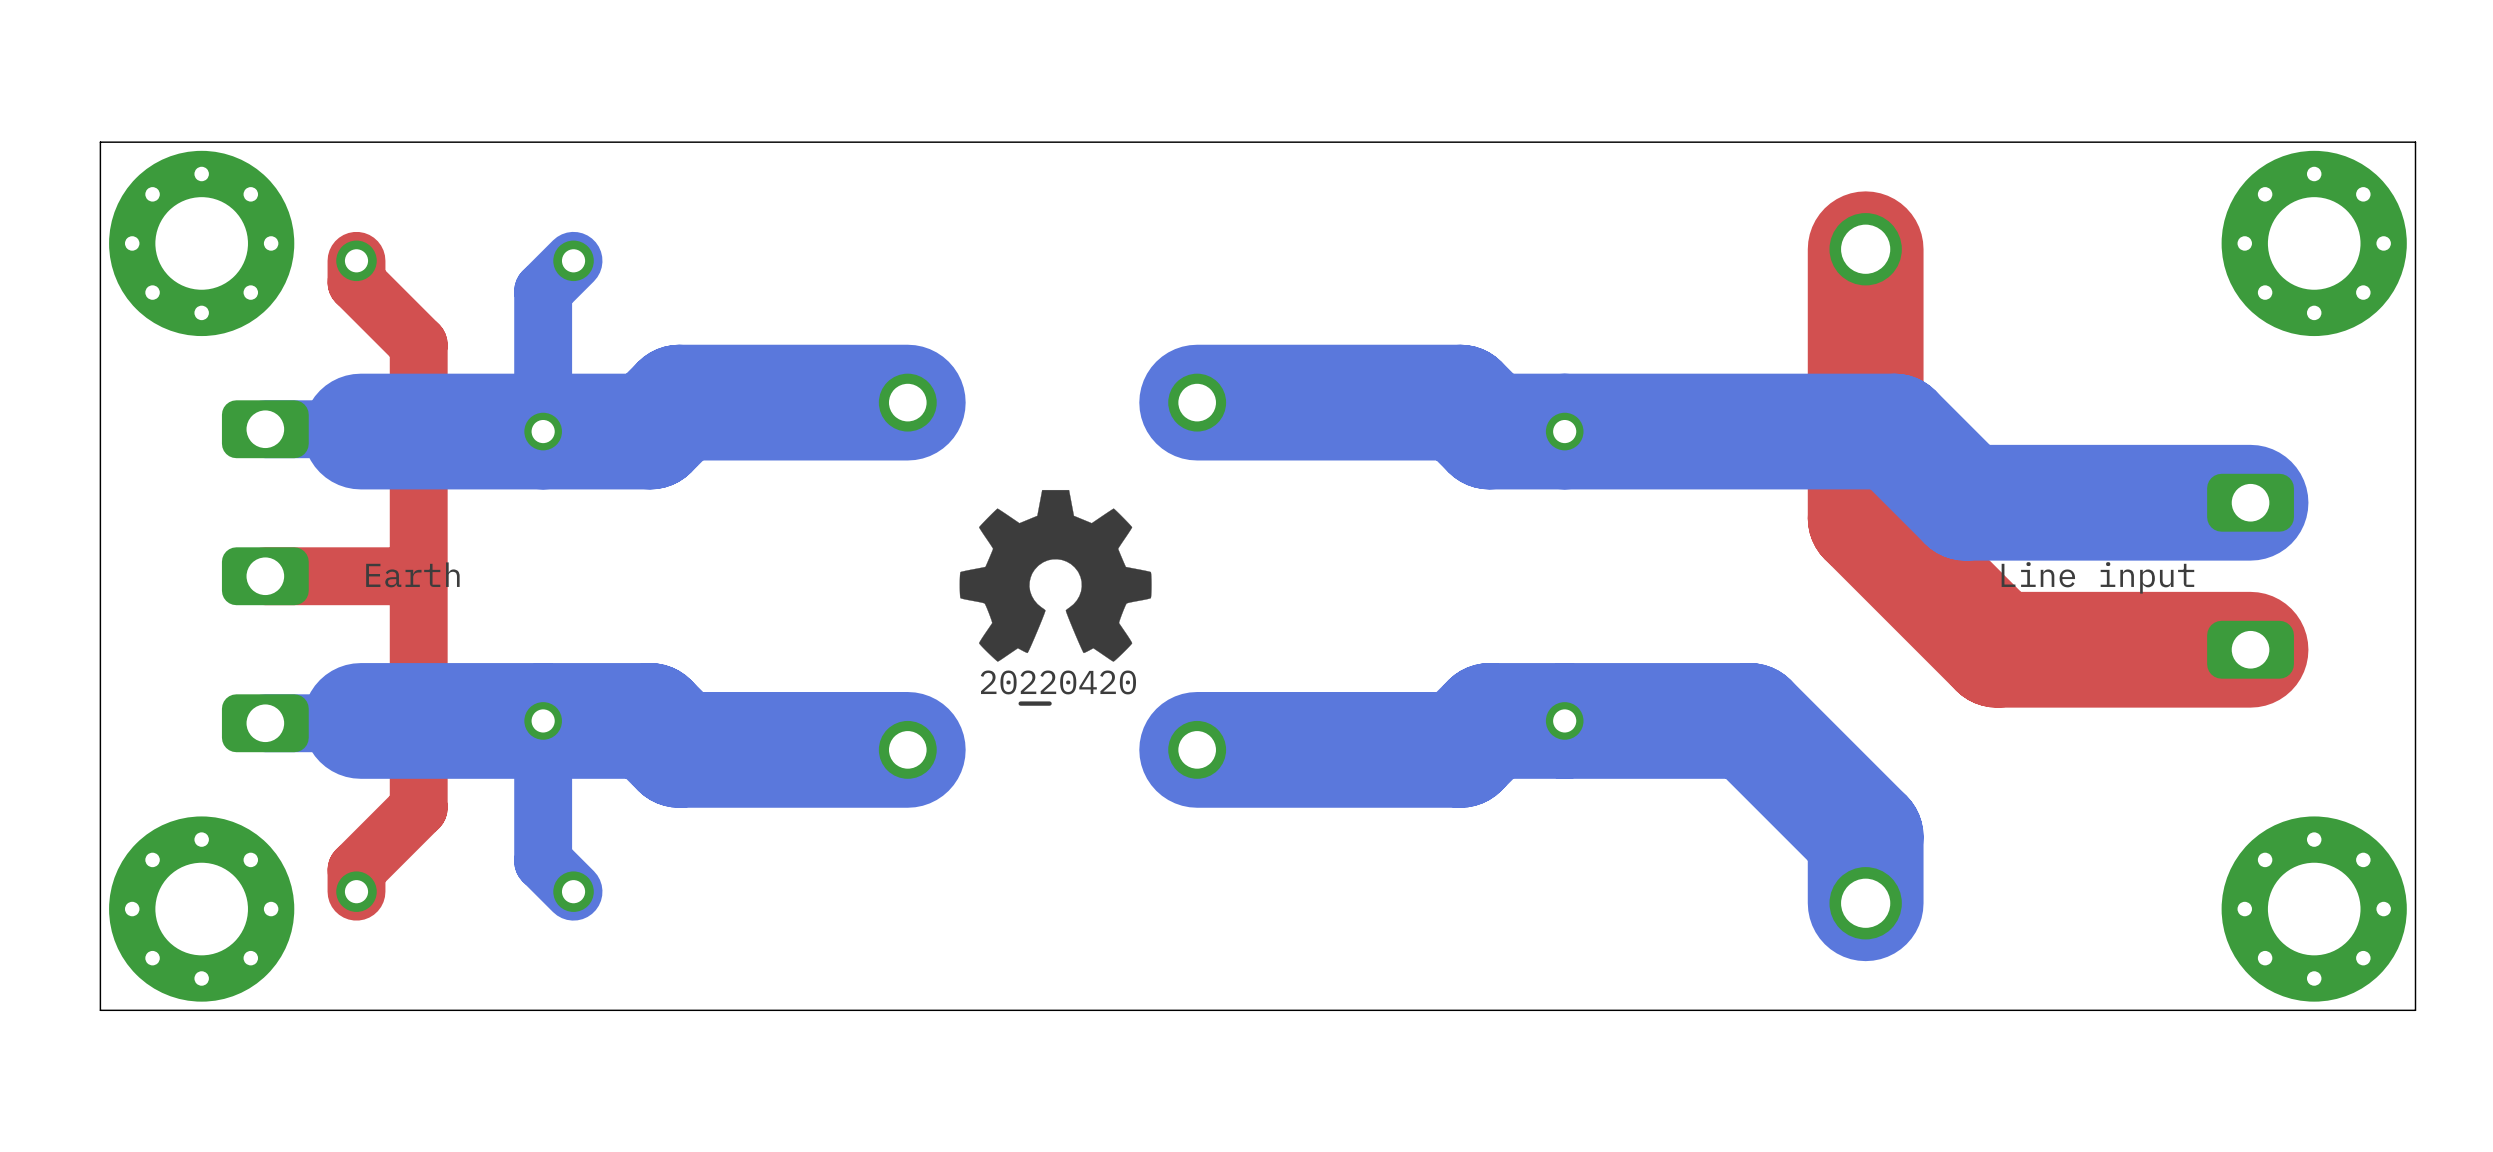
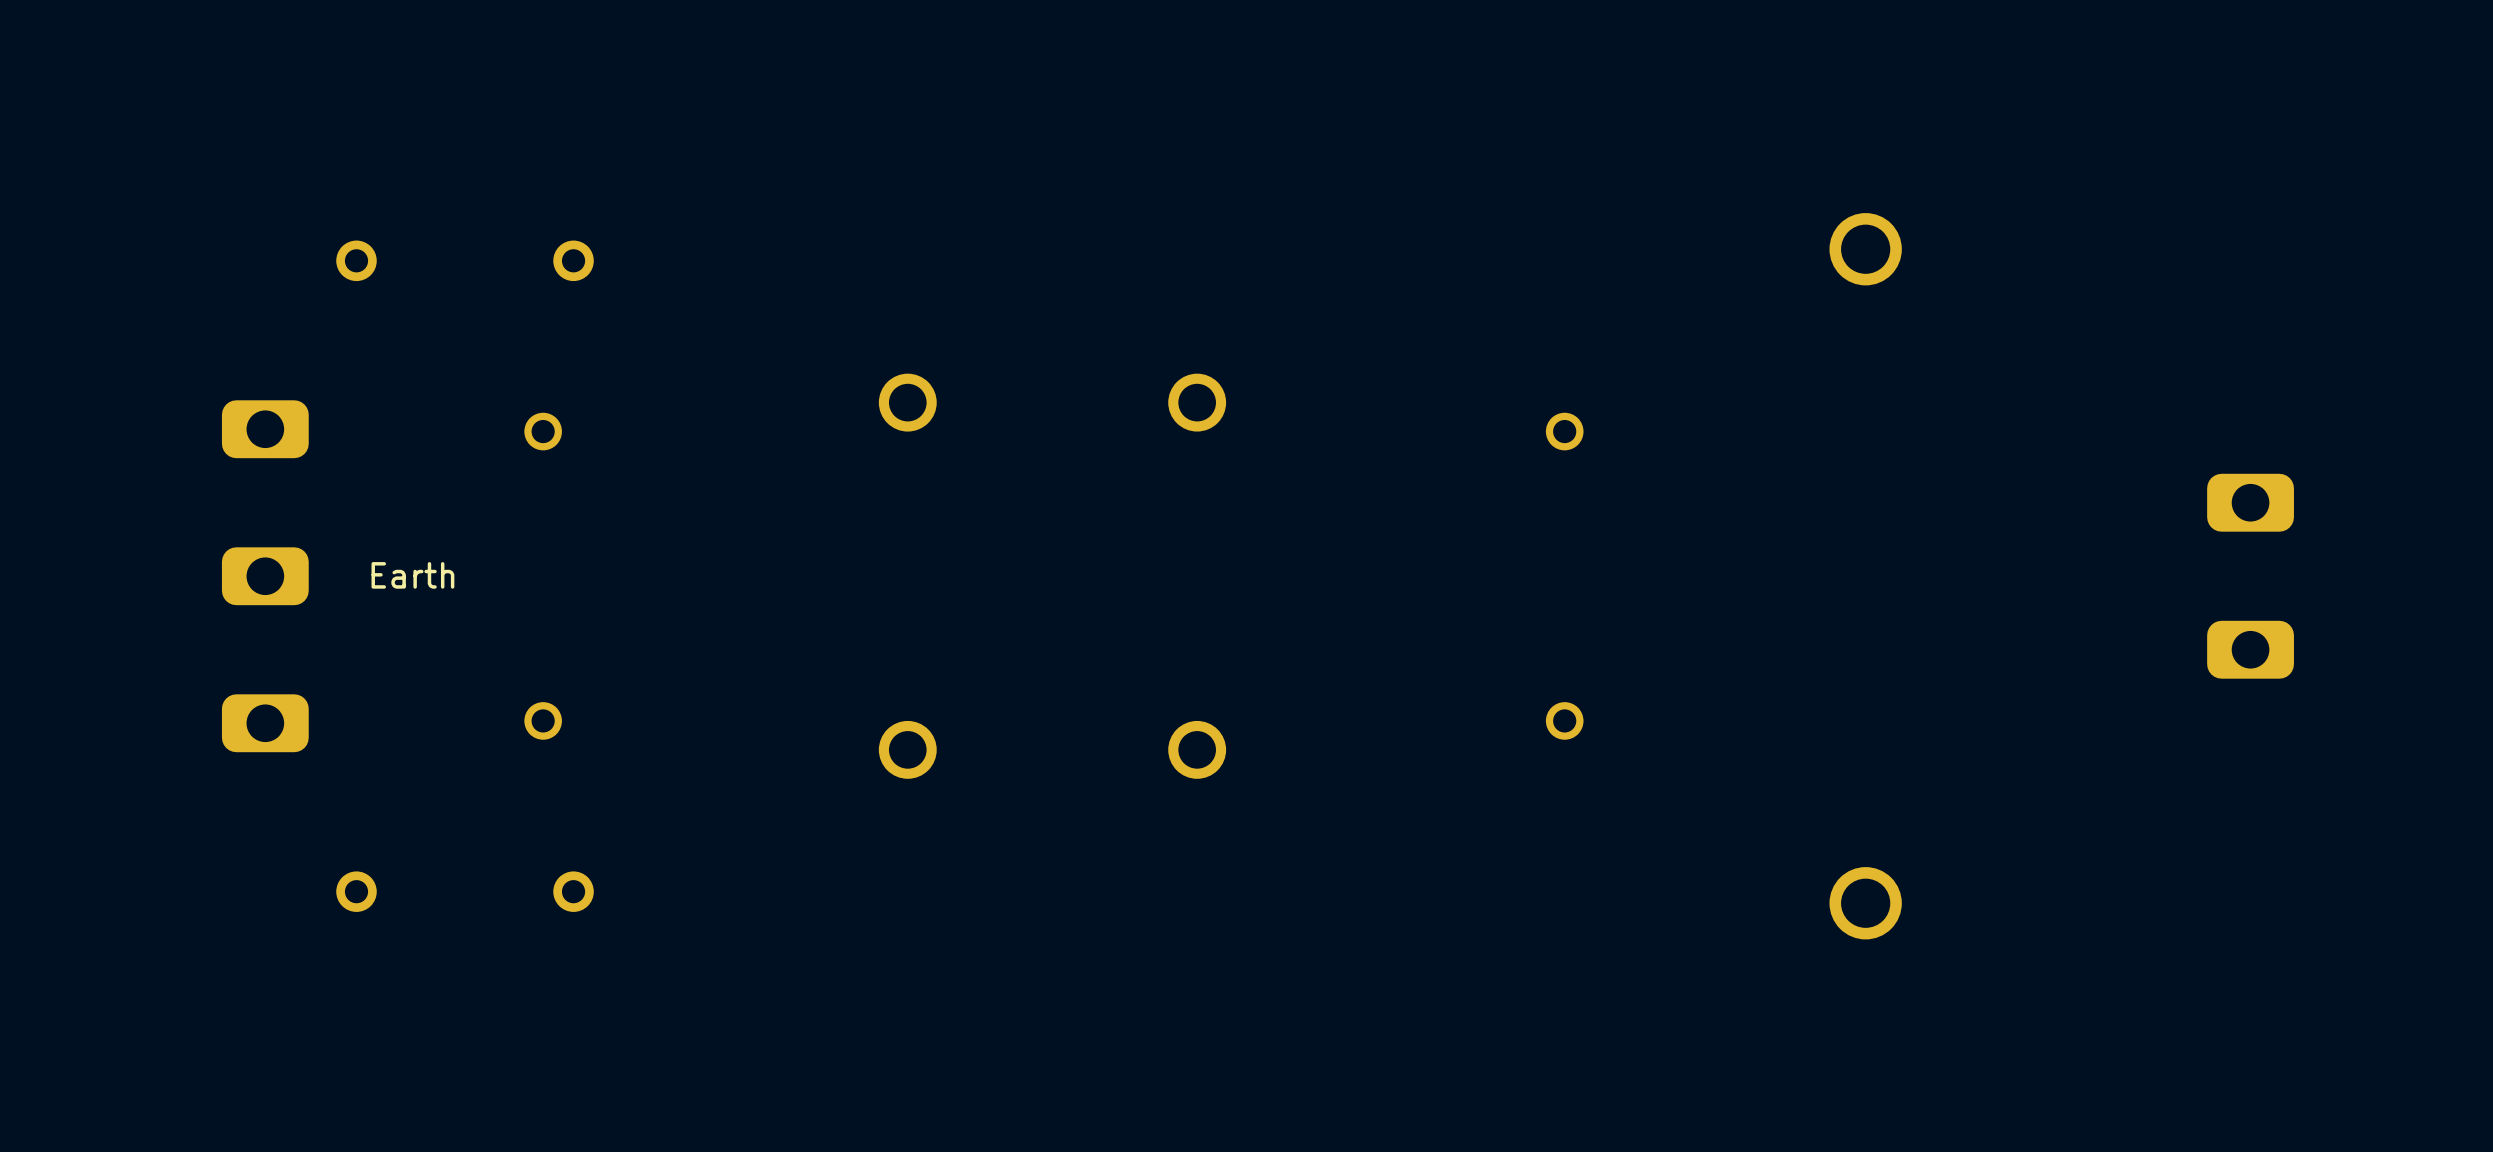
board edge: (2415, 142) (2415, 1010) (100, 1010) (100, 142) (2415, 142) -> none
part: (201, 243) -> none
part: (2314, 243) -> none
top track: (1865, 249) (1865, 518) (1997, 649) (2250, 649) -> none
top track: (356, 260) (356, 282) (418, 344) (418, 807) (356, 869) (356, 891) -> none
bottom track: (573, 260) (543, 291) (543, 431) -> none
bottom track: (907, 402) (679, 402) (650, 431) (360, 431) (358, 429) (265, 429) -> none
bottom track: (1197, 402) (1460, 402) (1489, 431) (1894, 431) (1965, 502) (2250, 502) -> none
drawing: [959, 489, 1152, 706] -> none
top track: (418, 576) (265, 576) -> none
text: Line input (2097, 577) -> none
bottom track: (543, 720) (543, 861) (573, 891) -> none
bottom track: (265, 723) (358, 723) (360, 720) (650, 720) (679, 749) (907, 749) -> none
bottom track: (1197, 749) (1460, 749) (1489, 720) (1749, 720) (1865, 836) (1865, 903) -> none
part: (201, 909) -> none
part: (2314, 909) -> none

